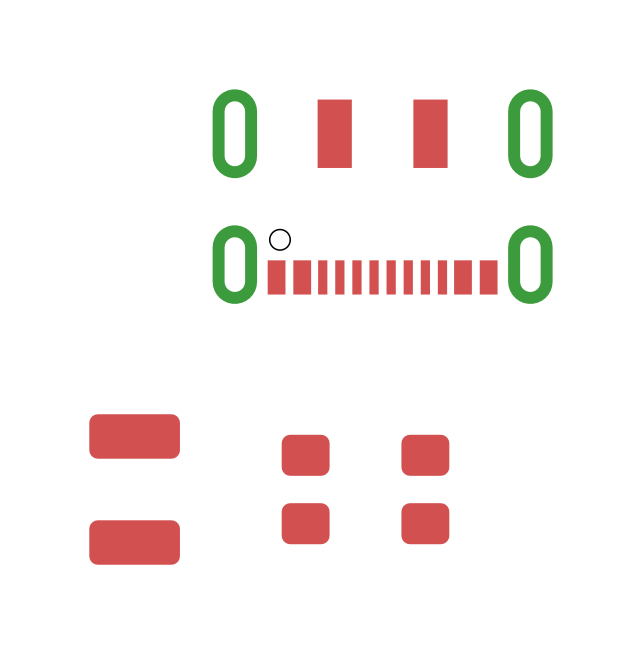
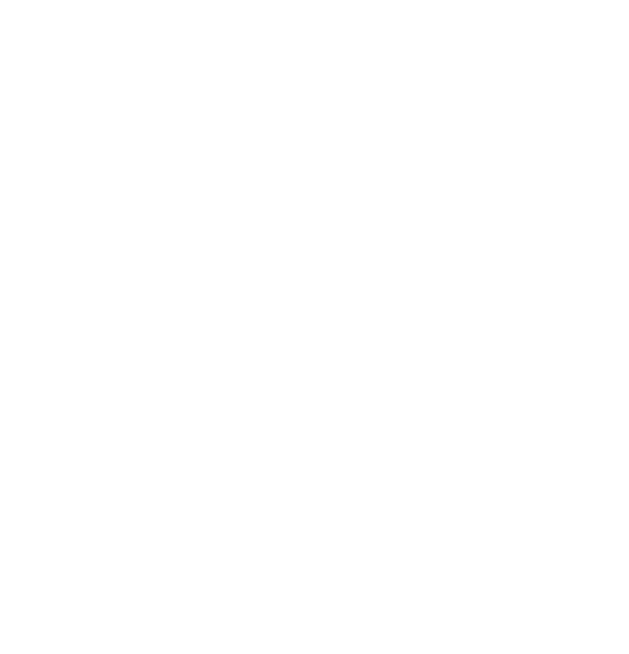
part: (382, 196) -> none
part: (134, 489) -> none
part: (305, 489) -> none
part: (425, 489) -> none

